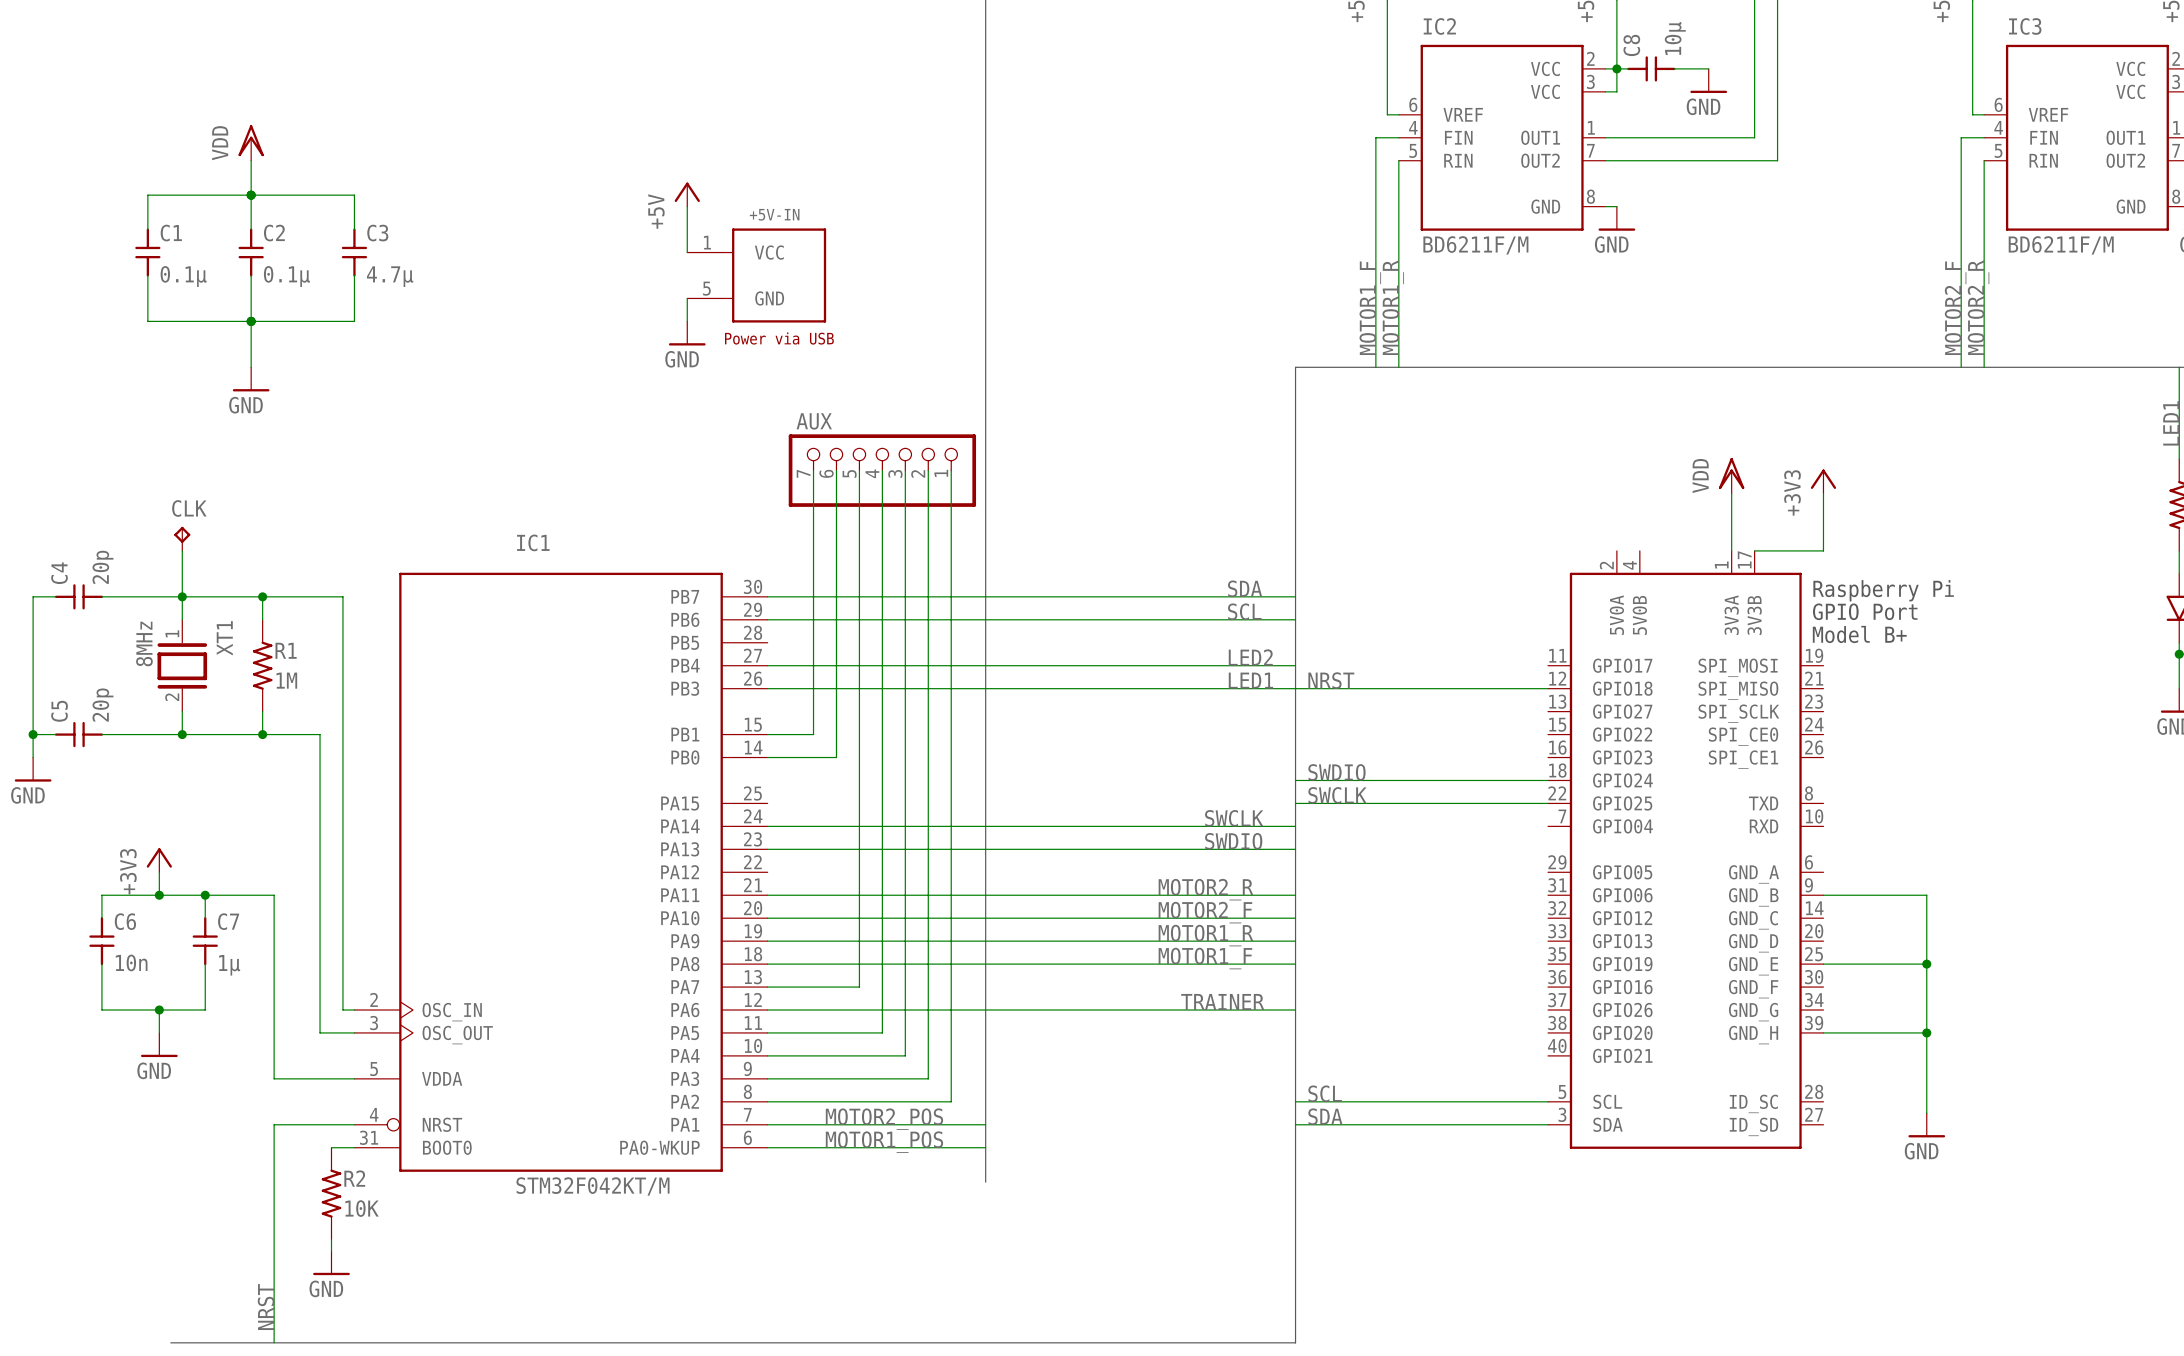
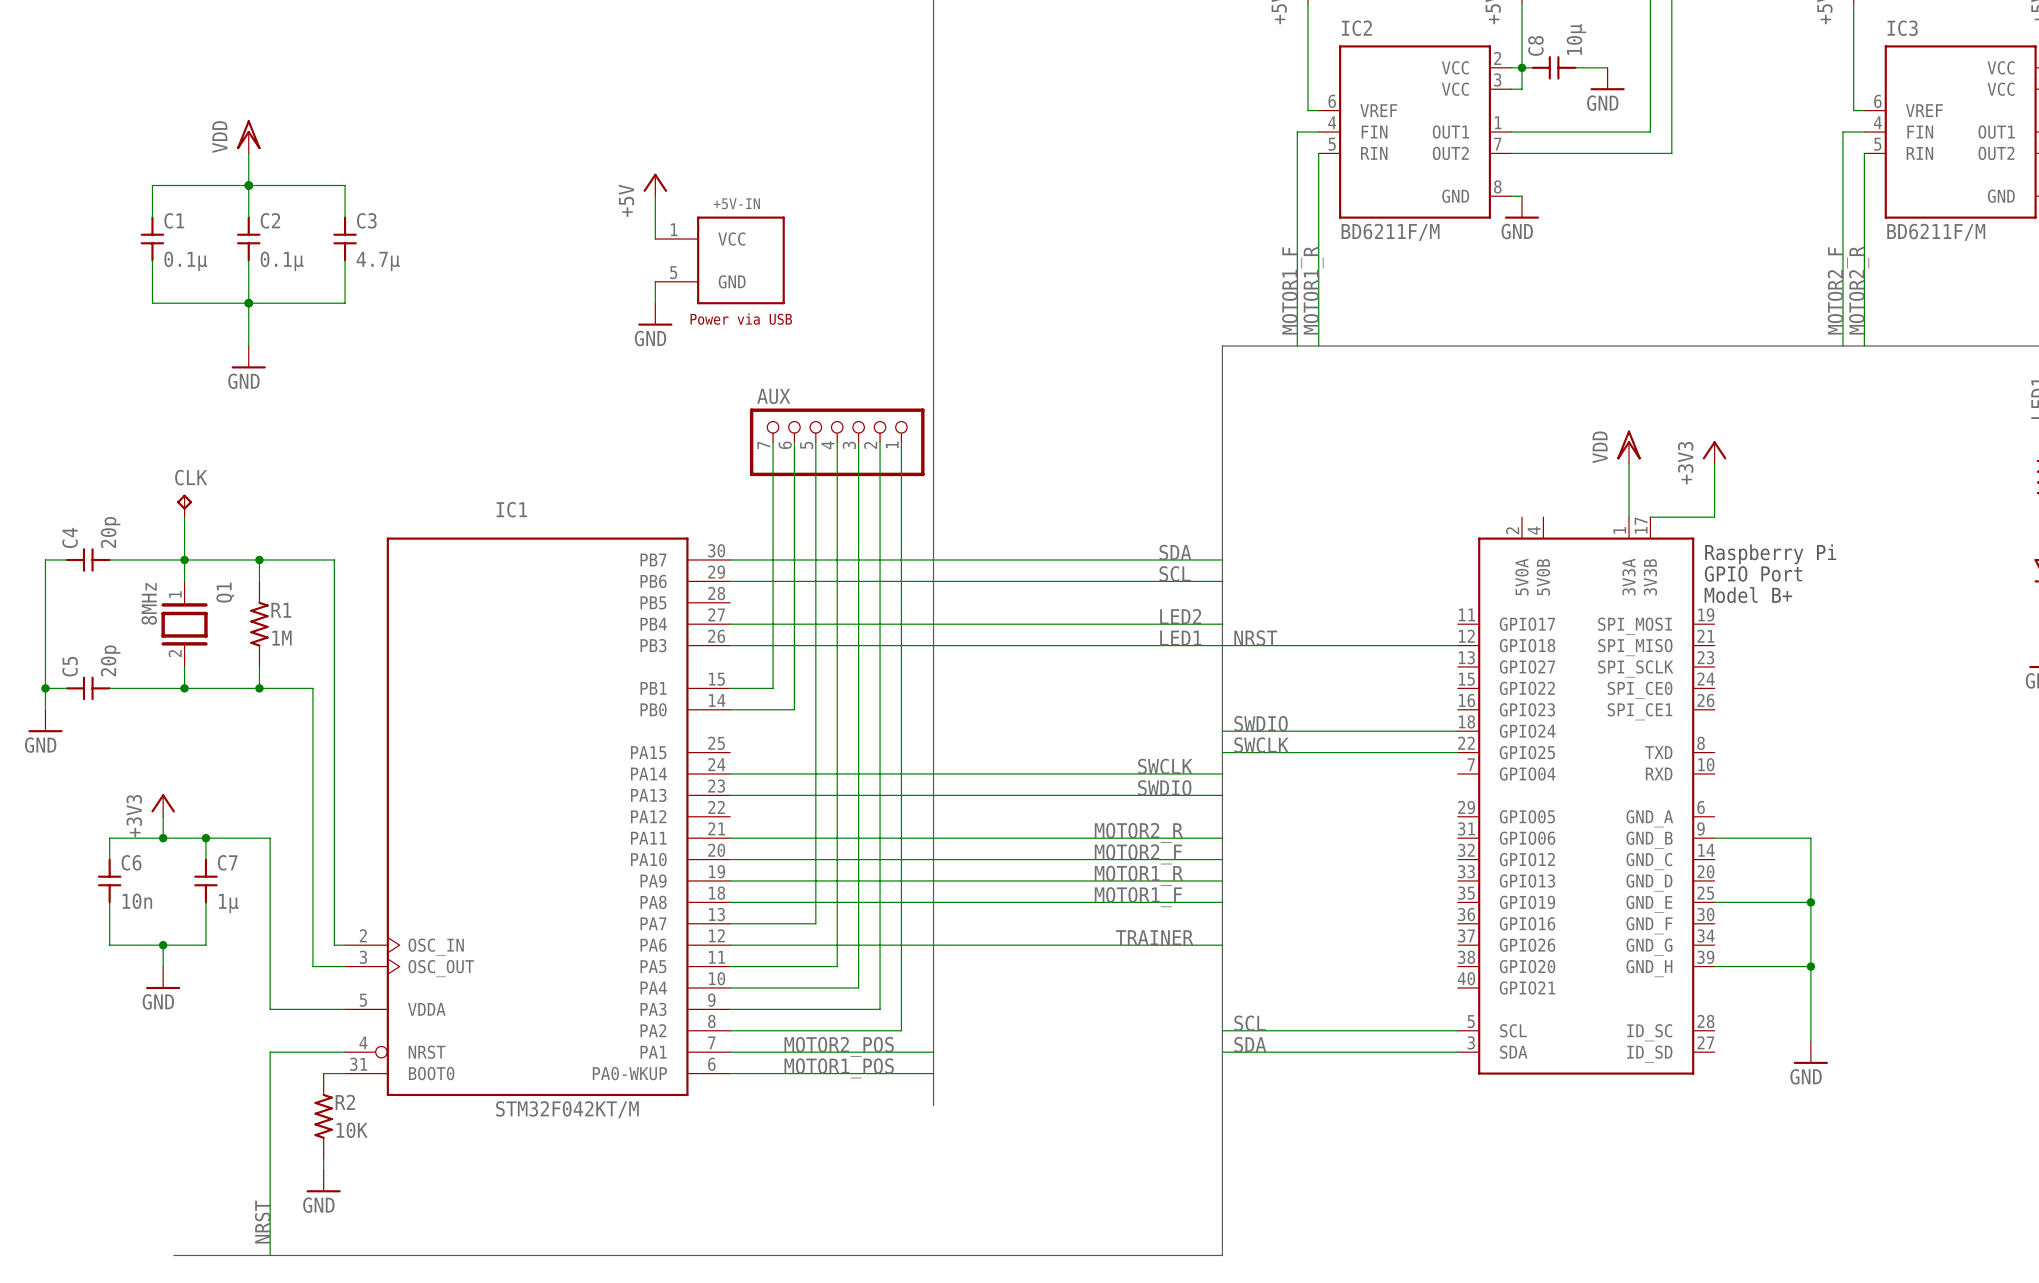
XT1 name: XT1 (224, 638) -> Q1 (225, 592)

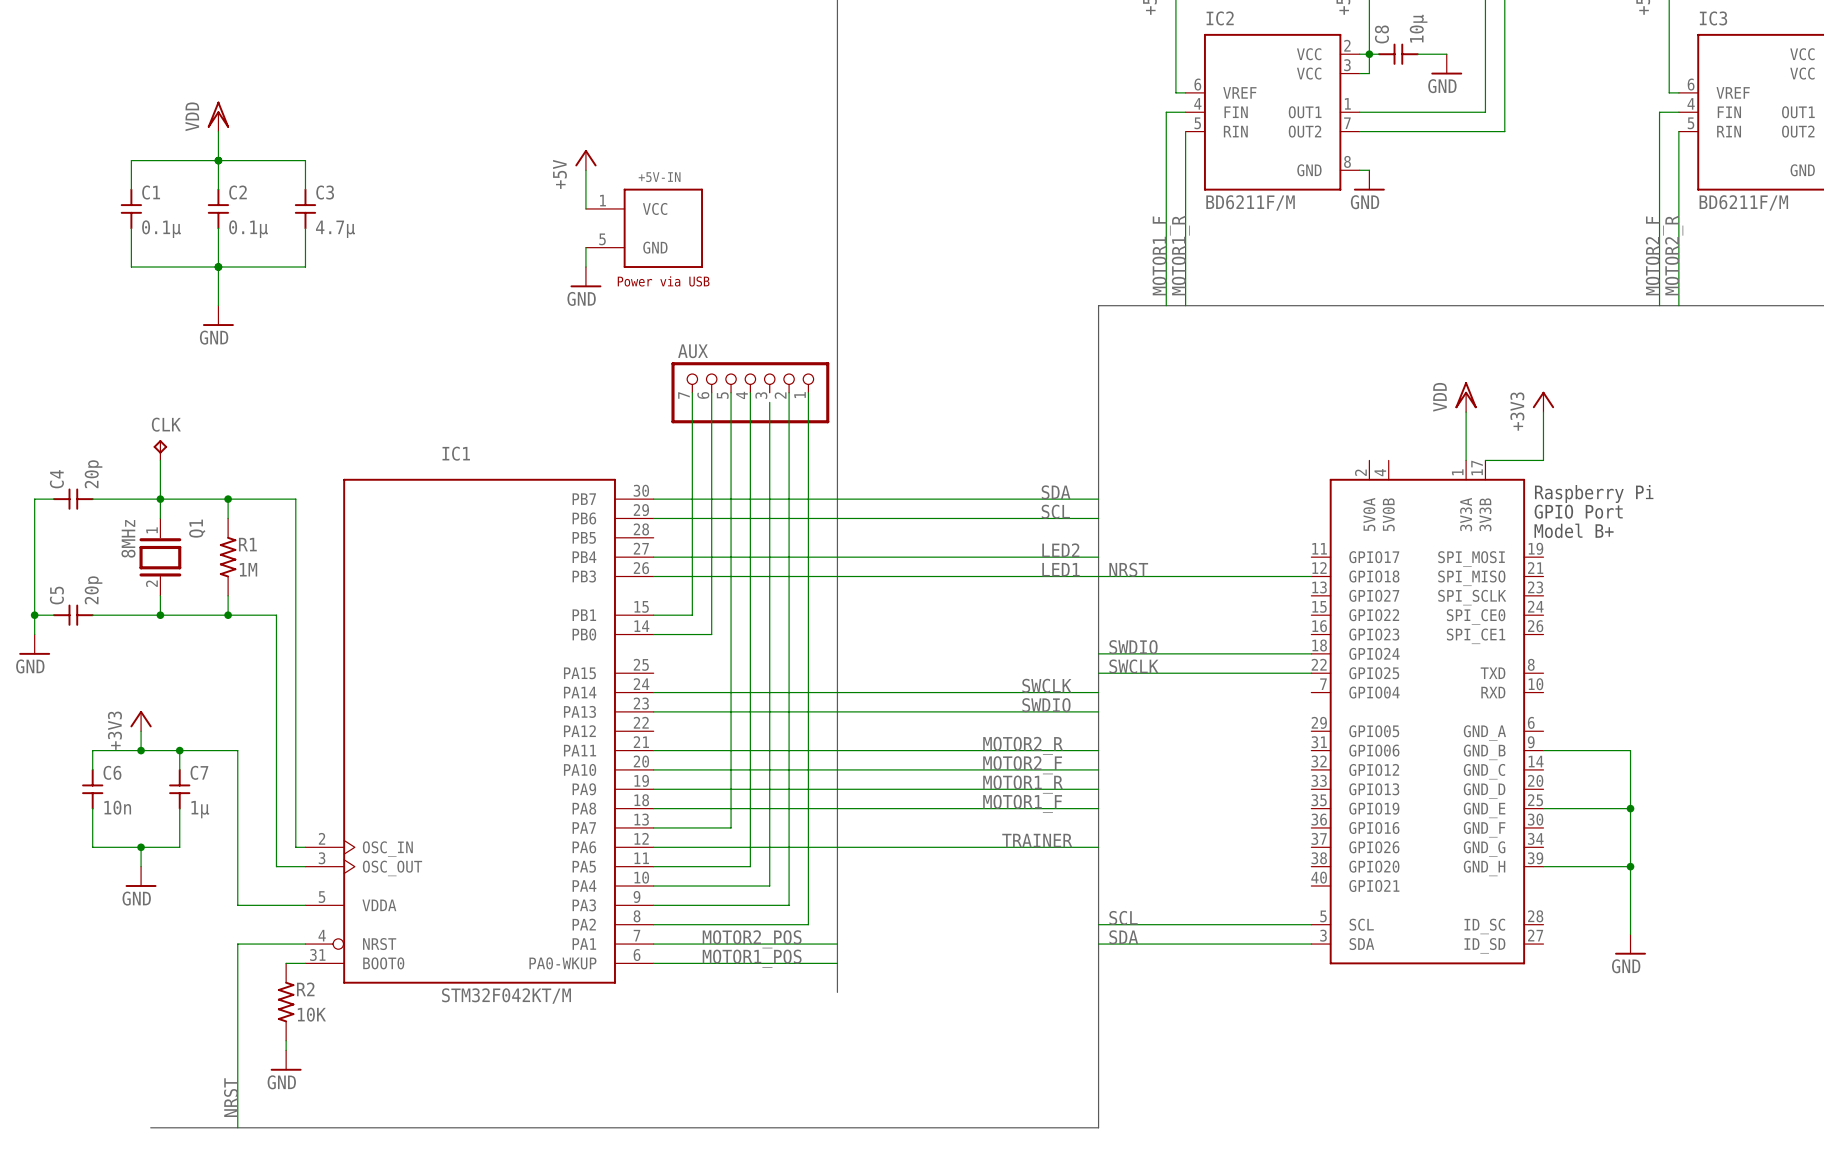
wire: (858, 442) (858, 453) -> none

